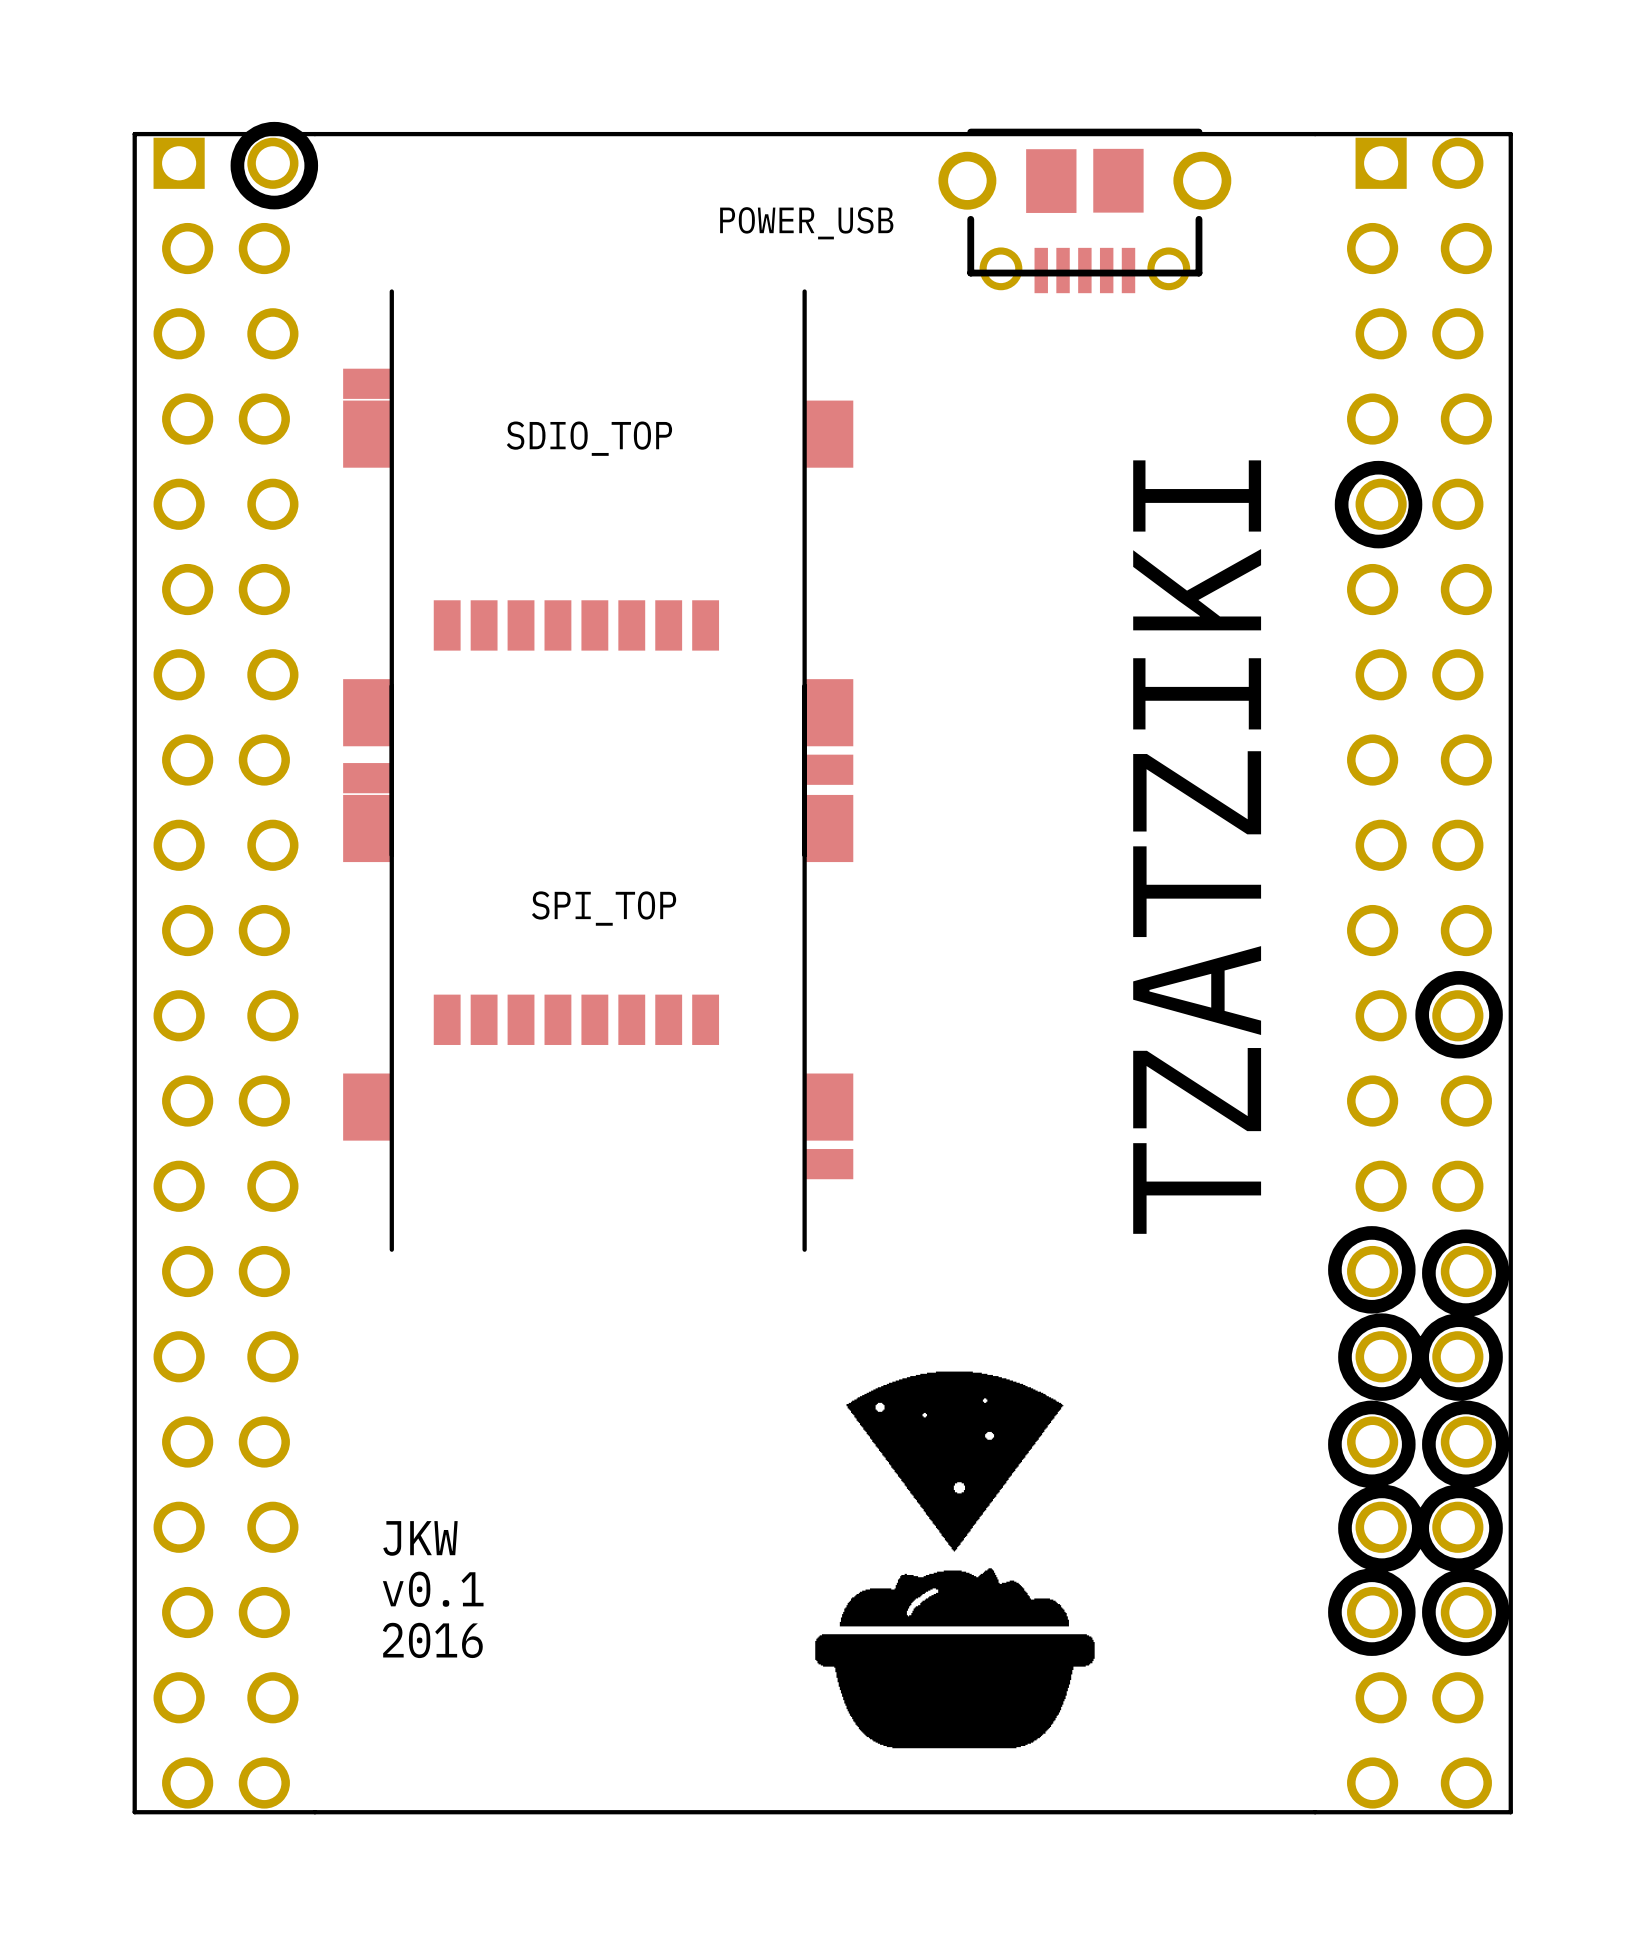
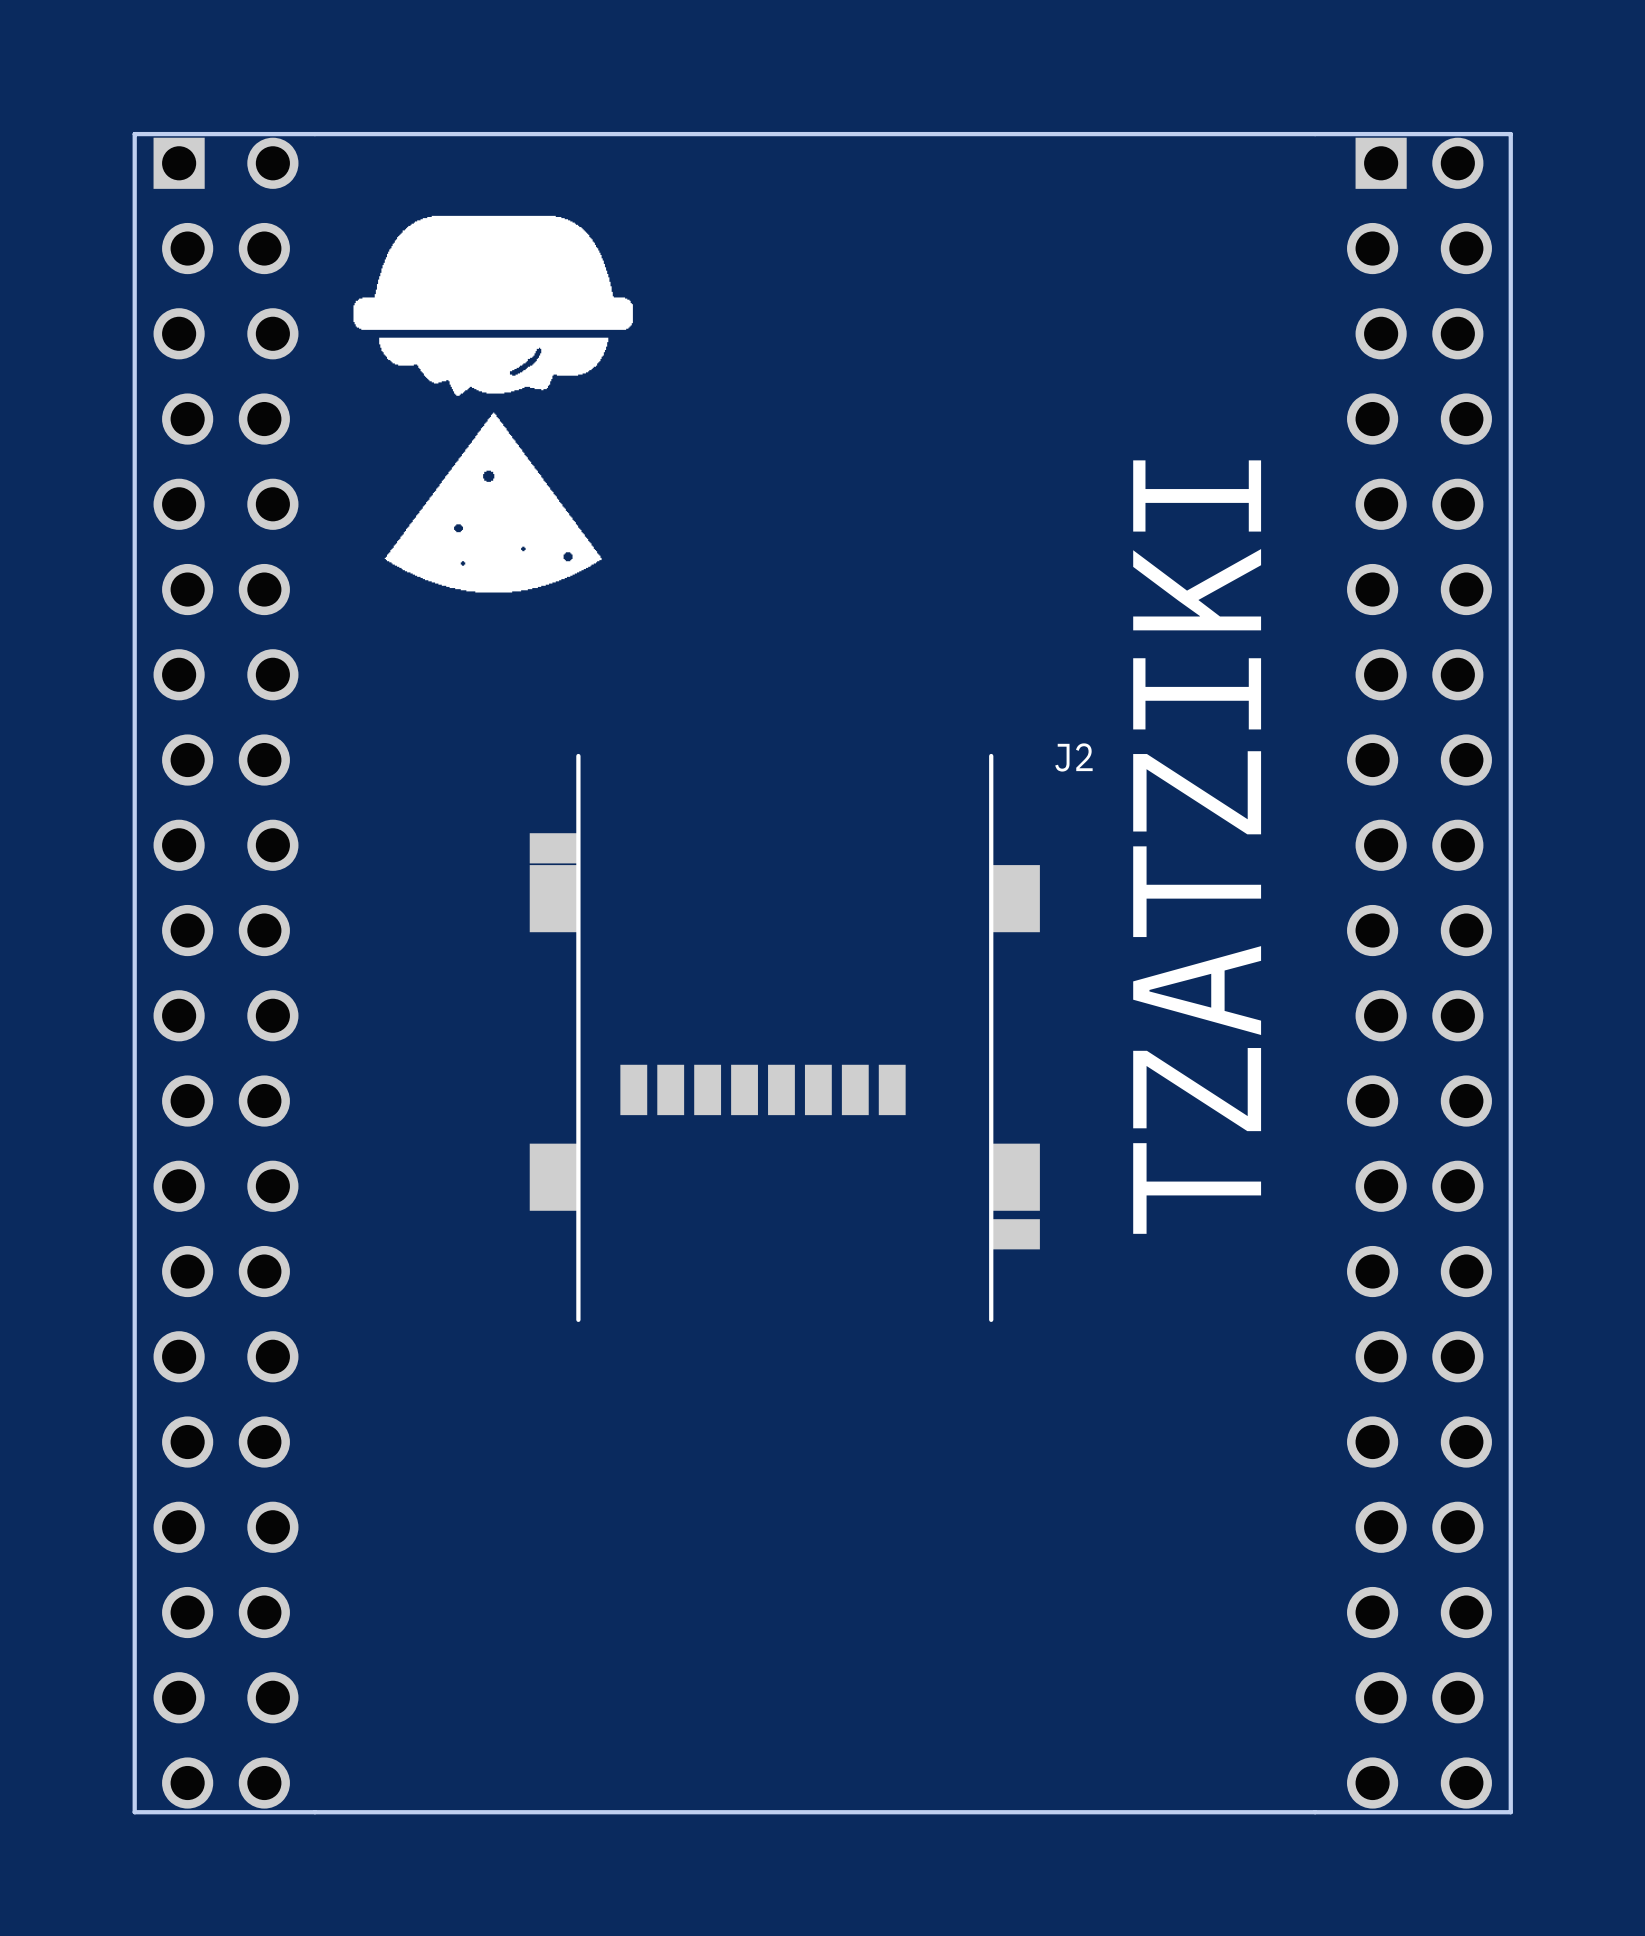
drawing: [230, 121, 319, 210] -> none
POWER_USB: (1084, 210) -> none
drawing: none -> [353, 215, 633, 593]
drawing: [1334, 460, 1423, 549] -> none
SDIO_TOP: (598, 573) -> none
SPI_TOP: (598, 967) -> none
drawing: [1415, 971, 1503, 1059] -> none
J2: none -> (784, 1037)
drawing: [1328, 1226, 1510, 1656] -> none
drawing: [815, 1371, 1095, 1749] -> none
text: JKW (420, 1538) -> none
text: v0.1 (433, 1589) -> none
text: 2016 (432, 1640) -> none

